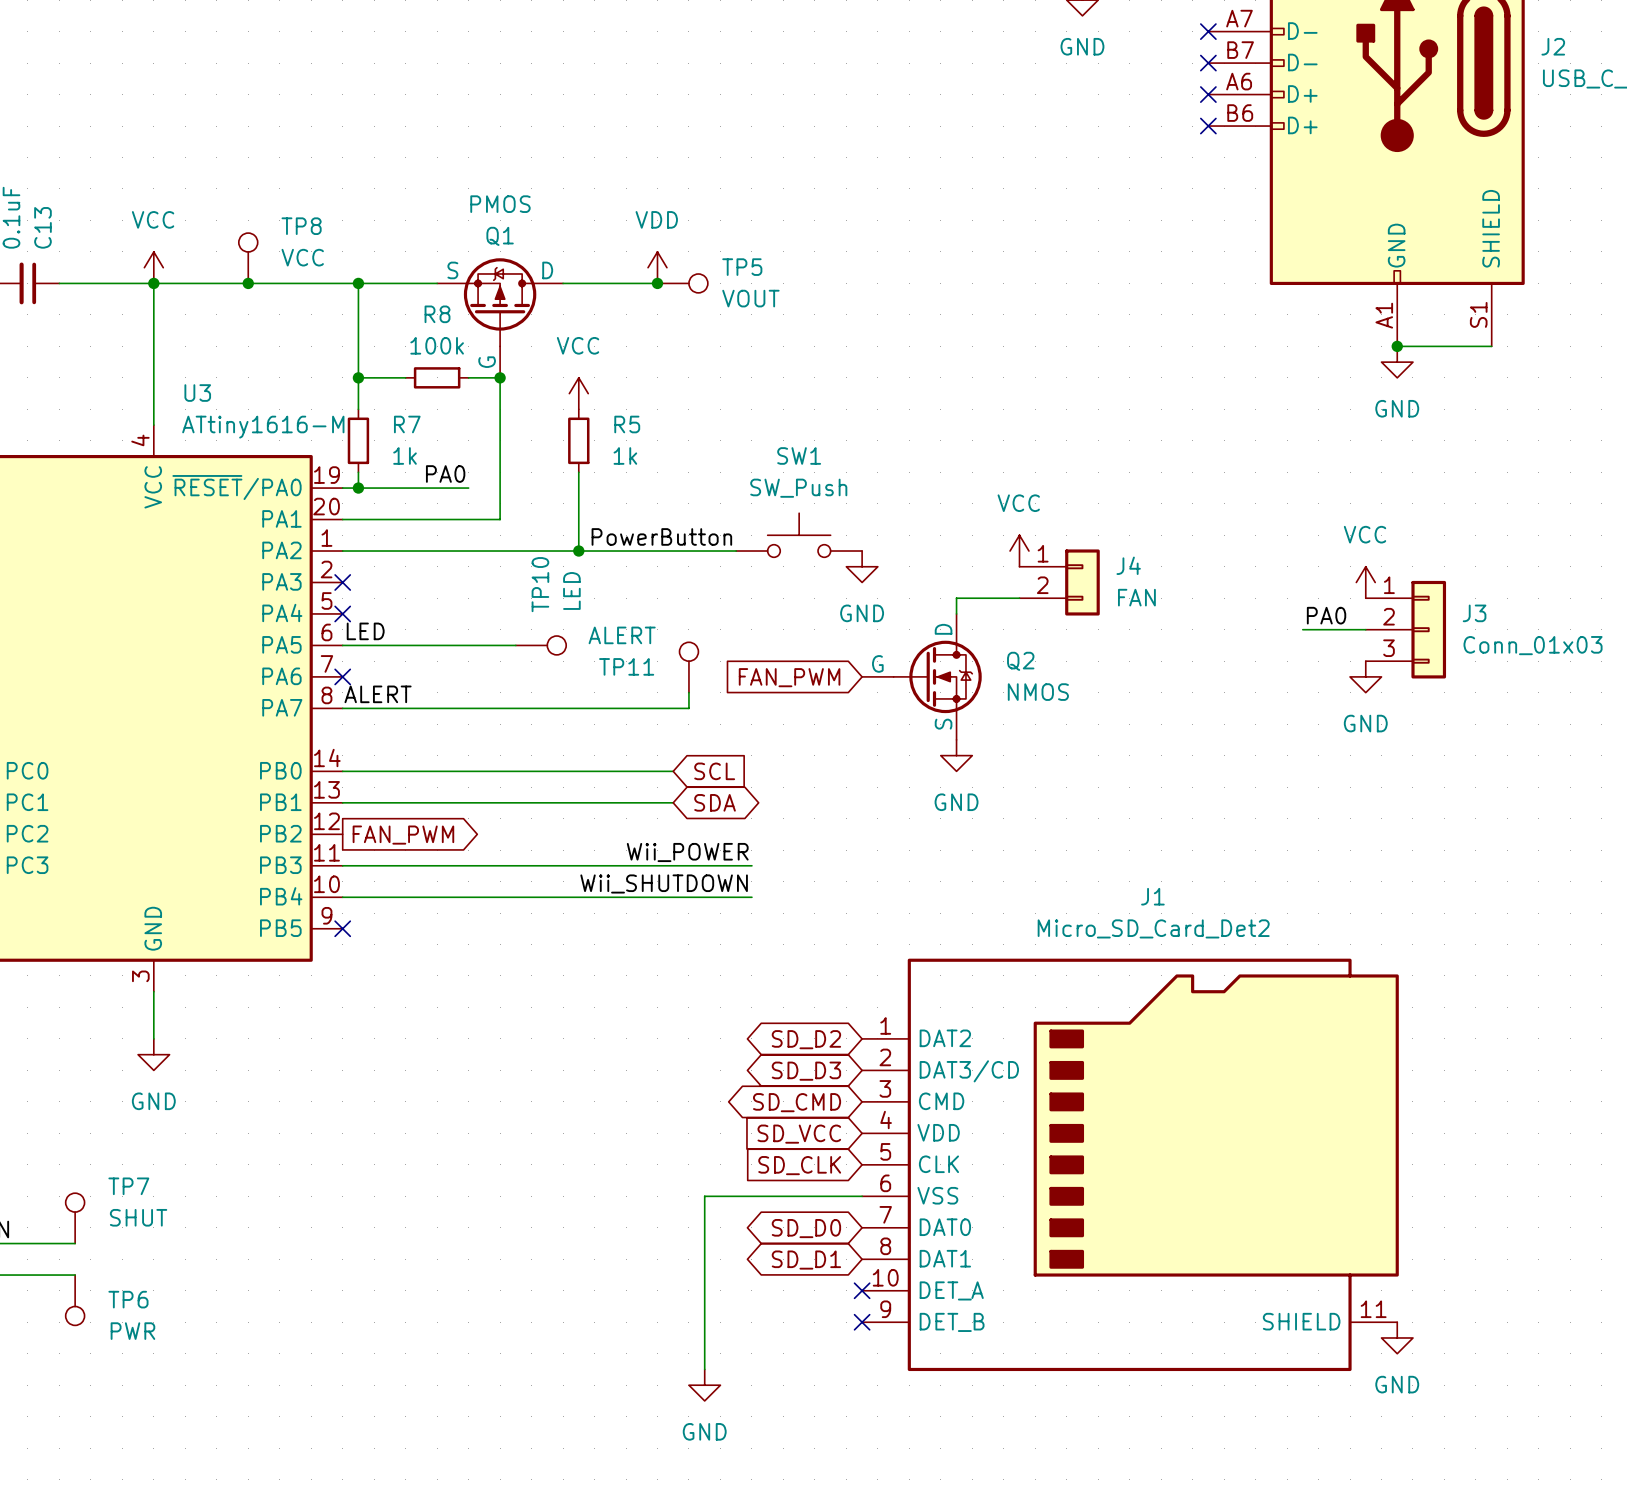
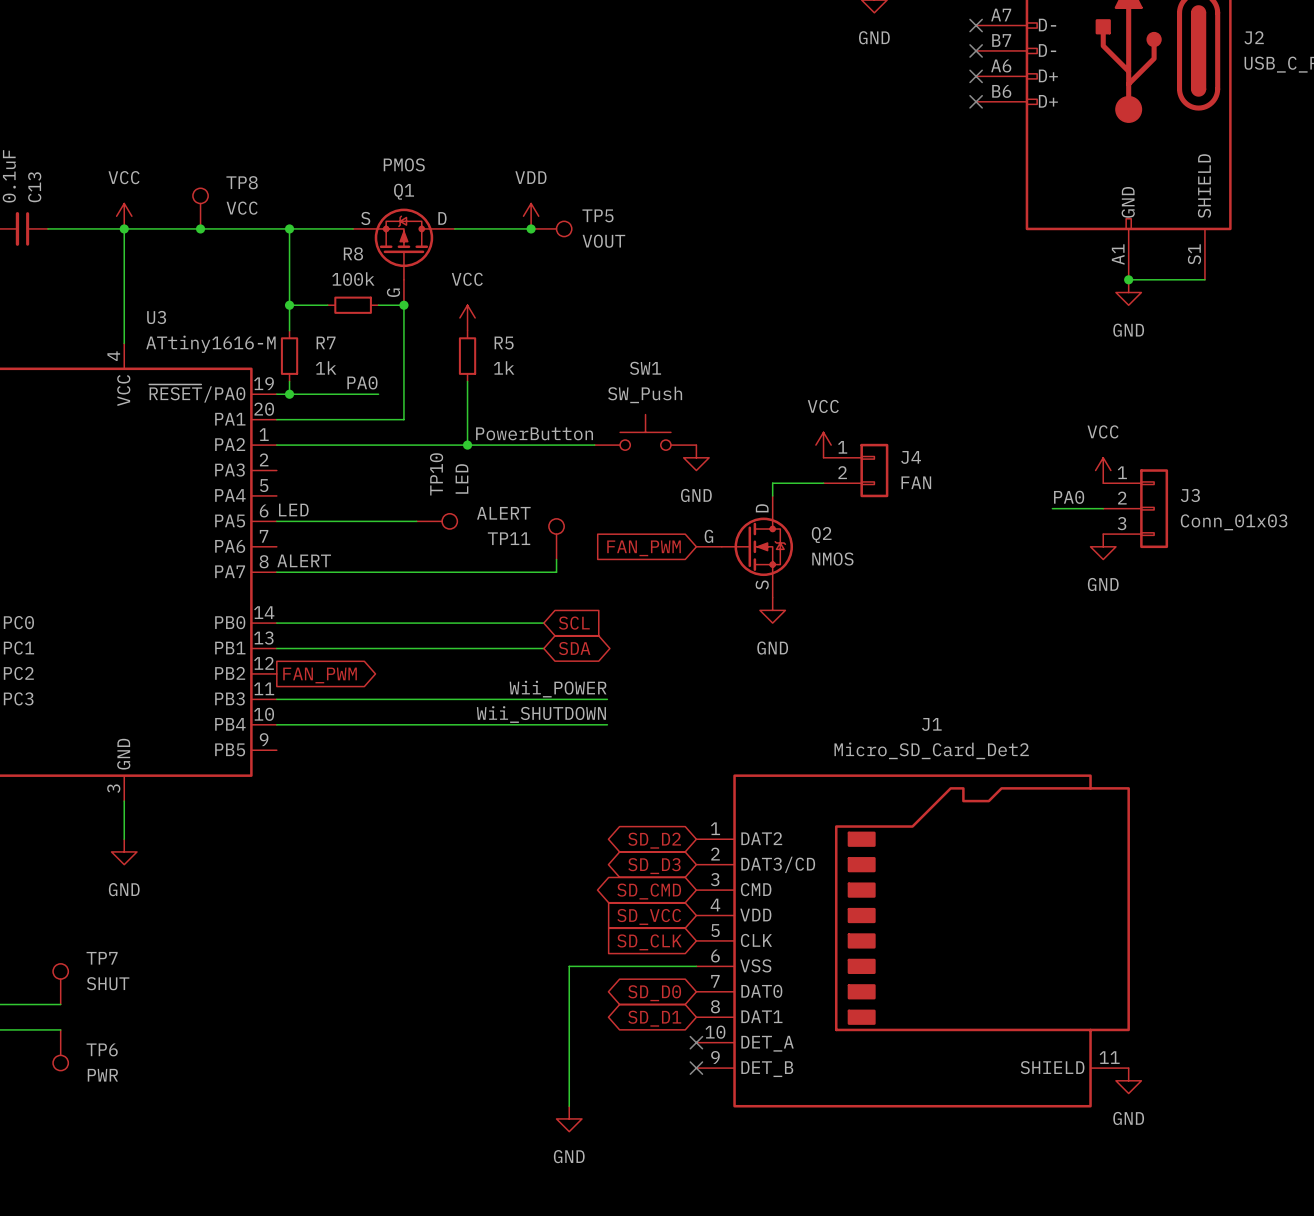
no-connect mark: (342, 582) -> none
no-connect mark: (342, 613) -> none
no-connect mark: (342, 676) -> none
no-connect mark: (342, 928) -> none

